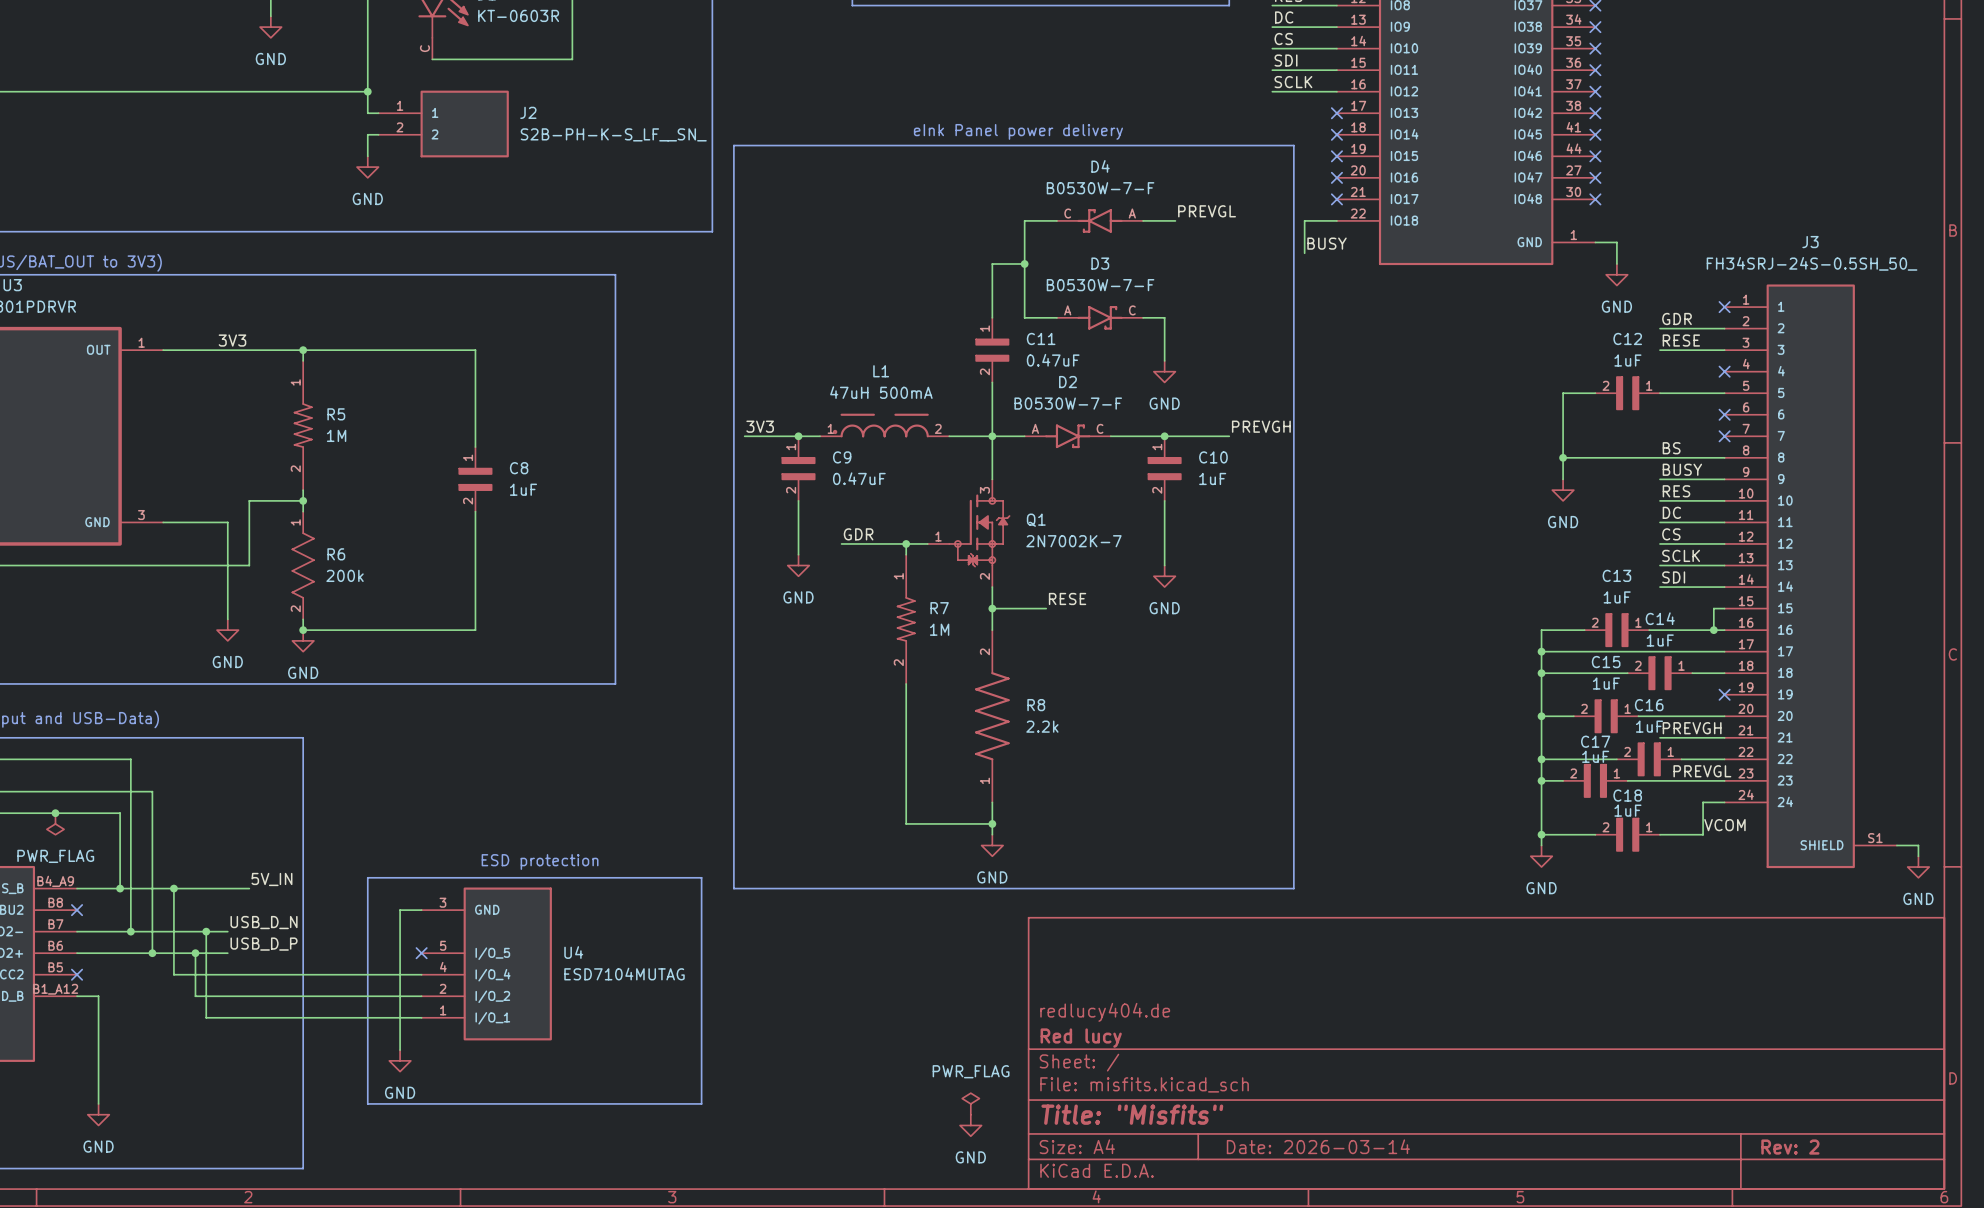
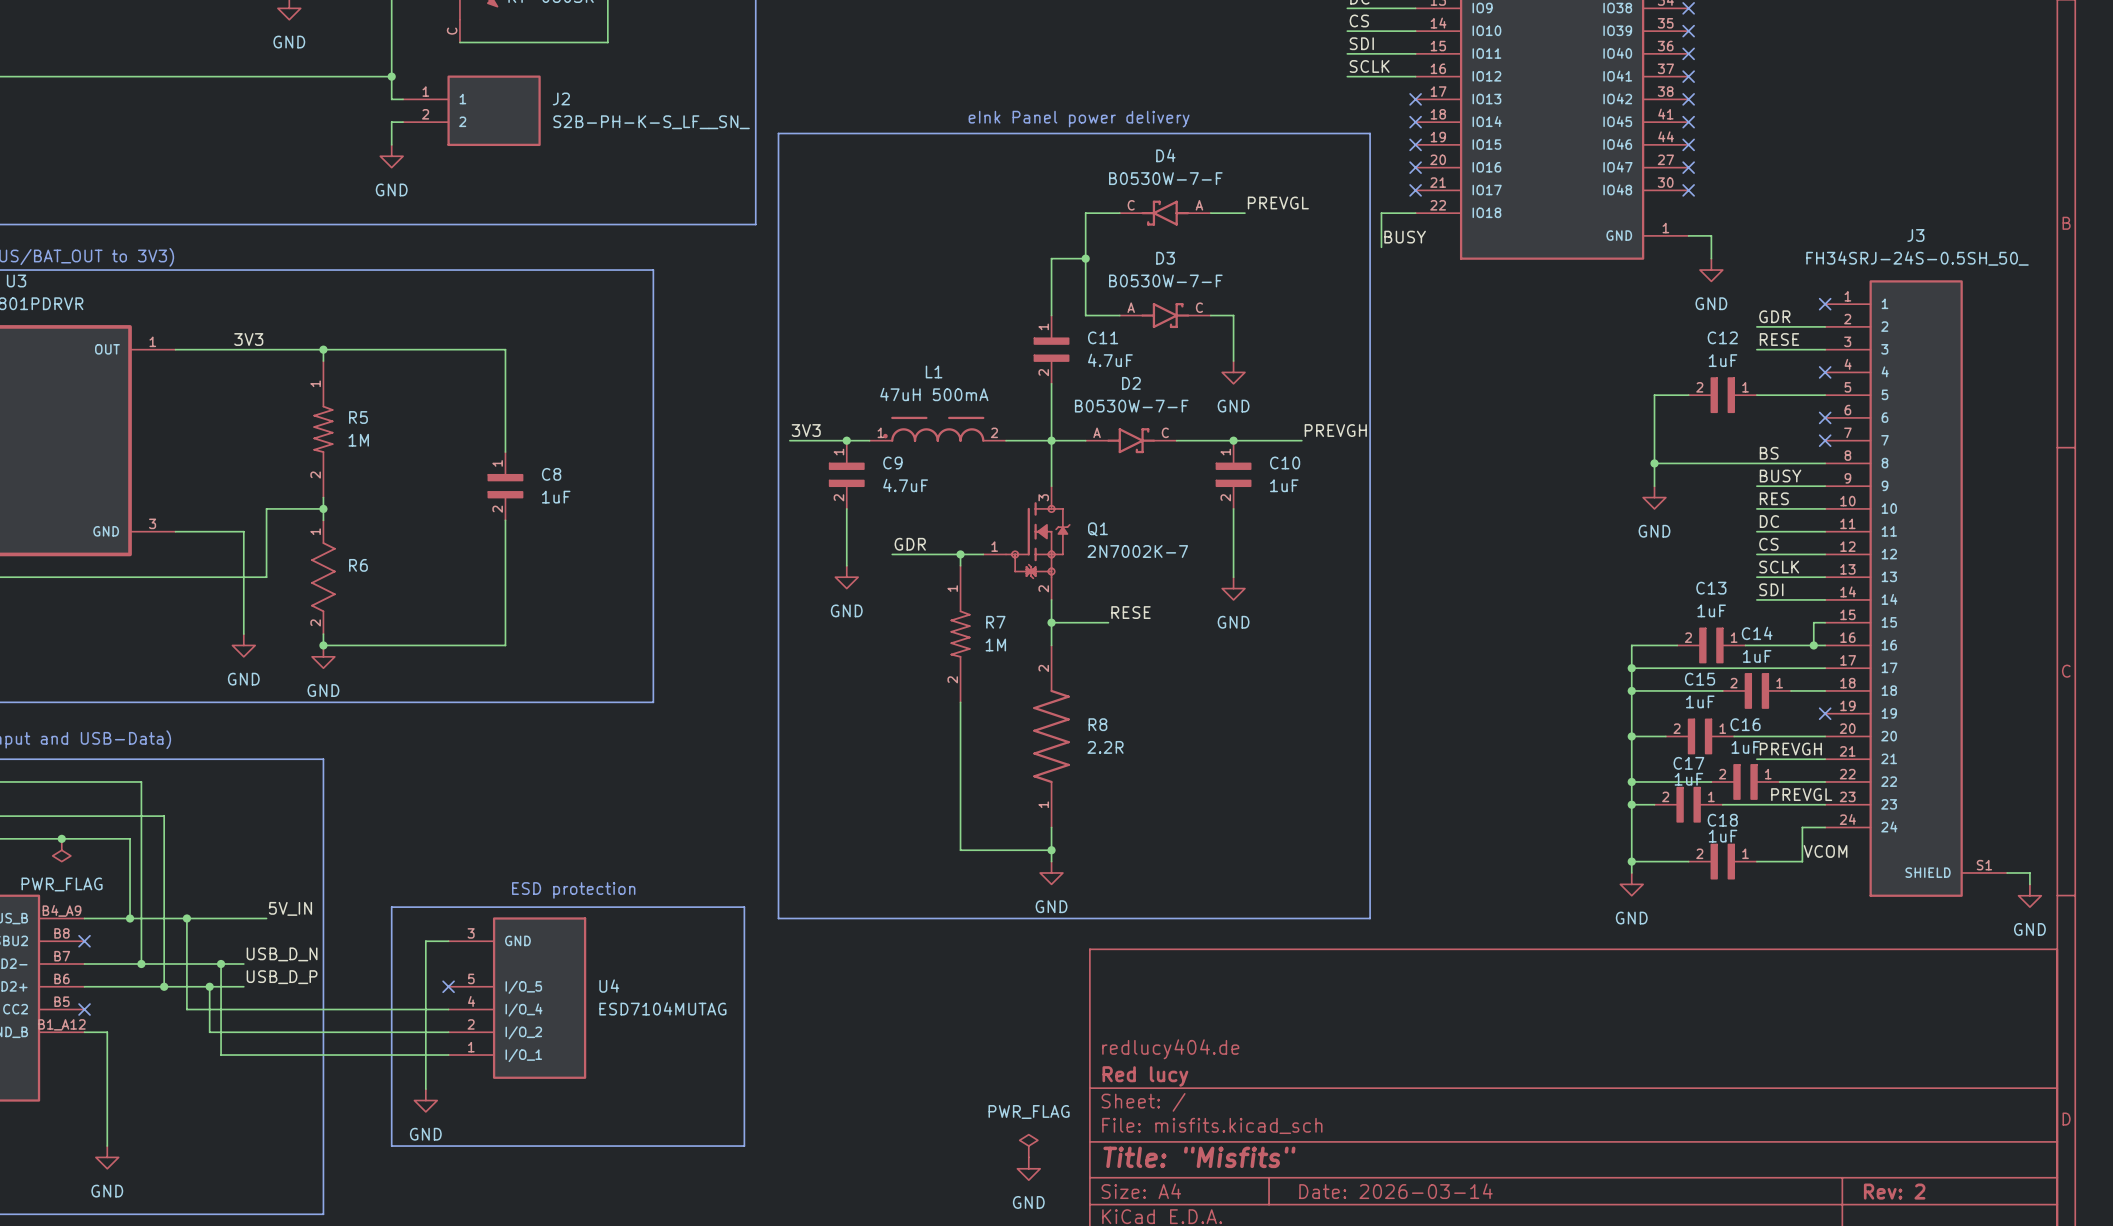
C11 value: 0.47uF (1053, 360) -> 4.7uF (1110, 360)
C9 value: 0.47uF (859, 478) -> 4.7uF (905, 485)
R6 value: 200k (345, 575) -> none
R8 value: 2.2k (1042, 726) -> 2.2R (1105, 747)

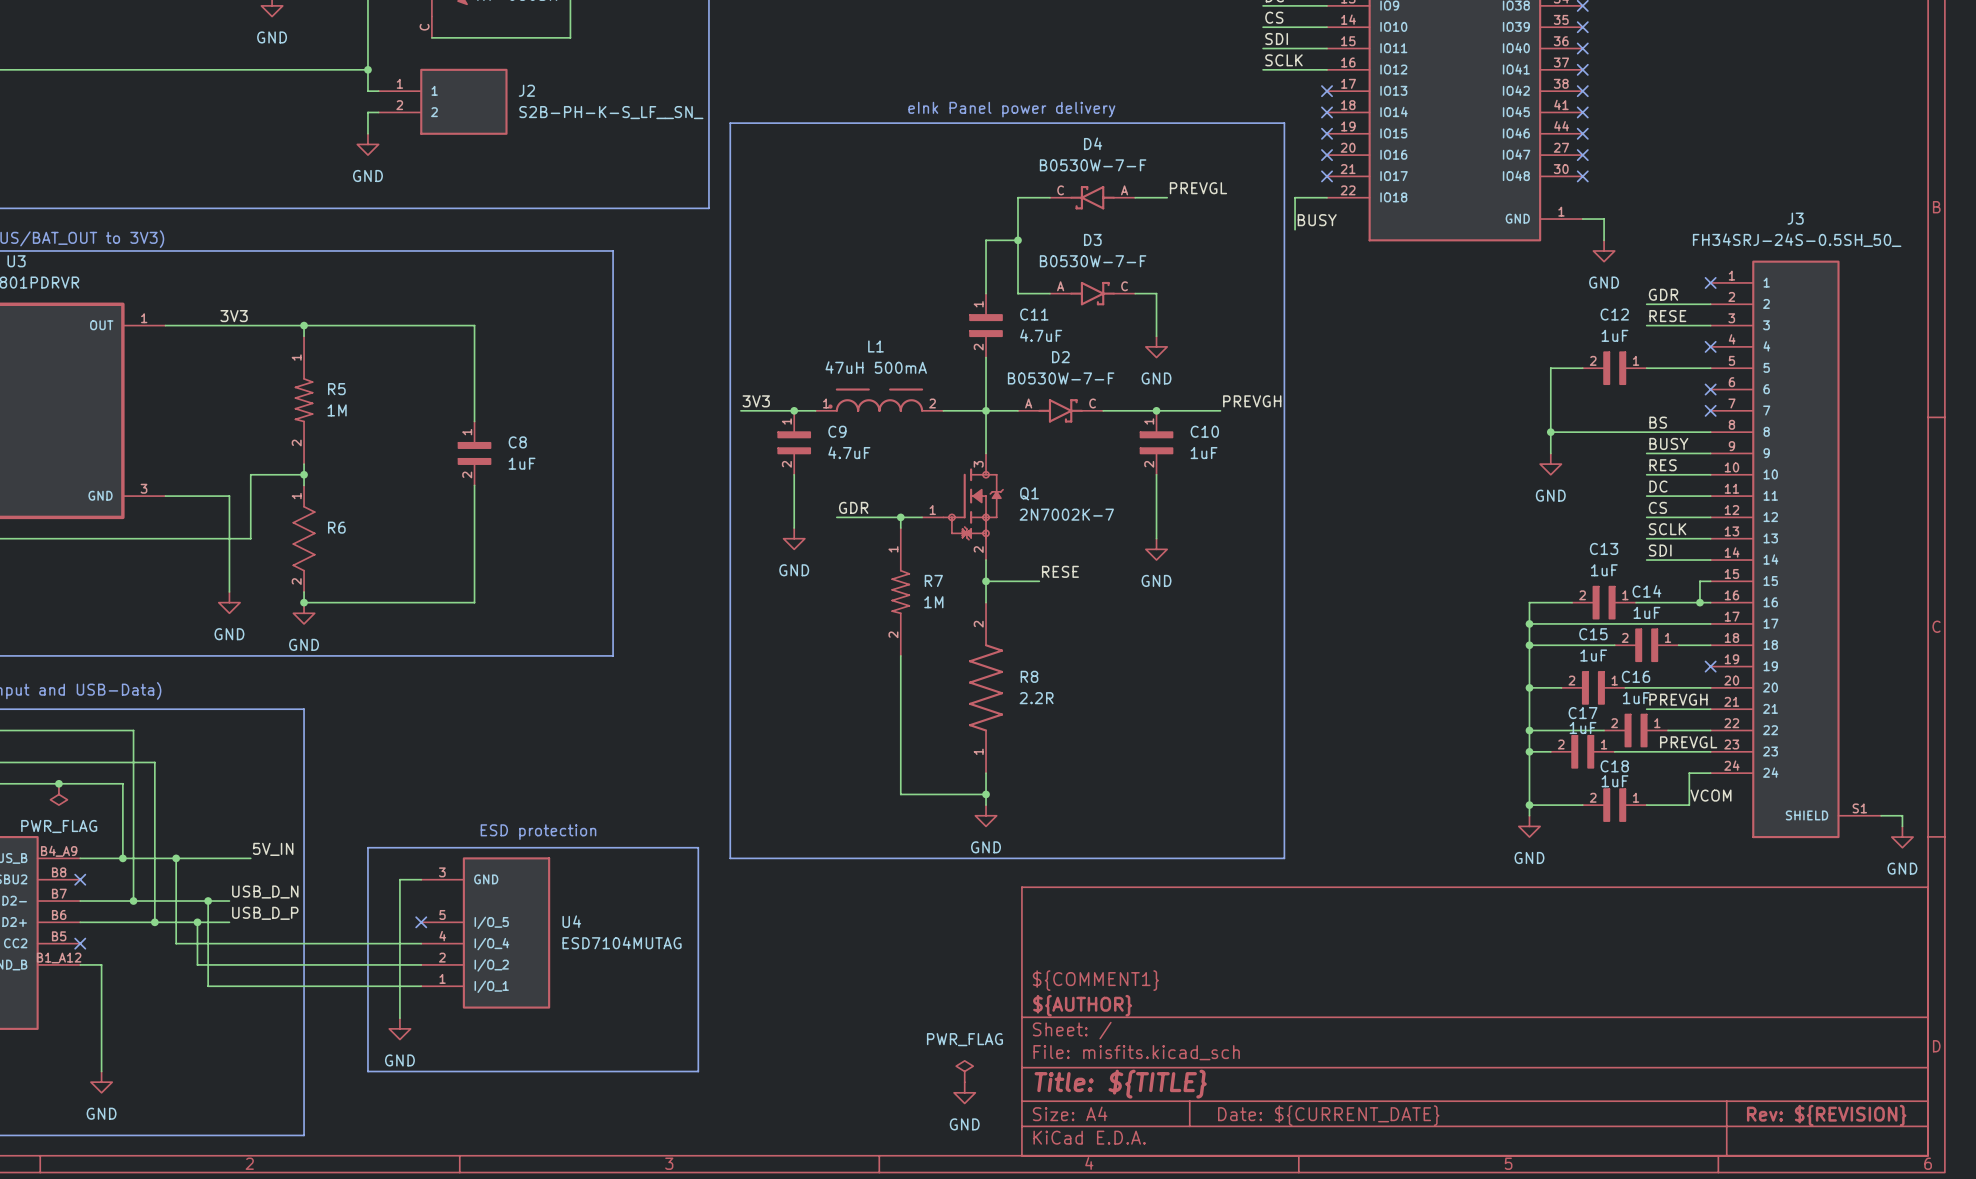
title block: redlucy404.de (1170, 1049) -> ${COMMENT1} (1095, 980)
title block: Red lucy (1145, 1076) -> ${AUTHOR} (1082, 1005)
title block: Title: "Misfits" (1199, 1157) -> Title: ${TITLE} (1120, 1084)
title block: Date: 2026-03-14 (1395, 1191) -> Date: ${CURRENT_DATE} (1328, 1115)
title block: Rev: 2 (1894, 1191) -> Rev: ${REVISION} (1826, 1115)

